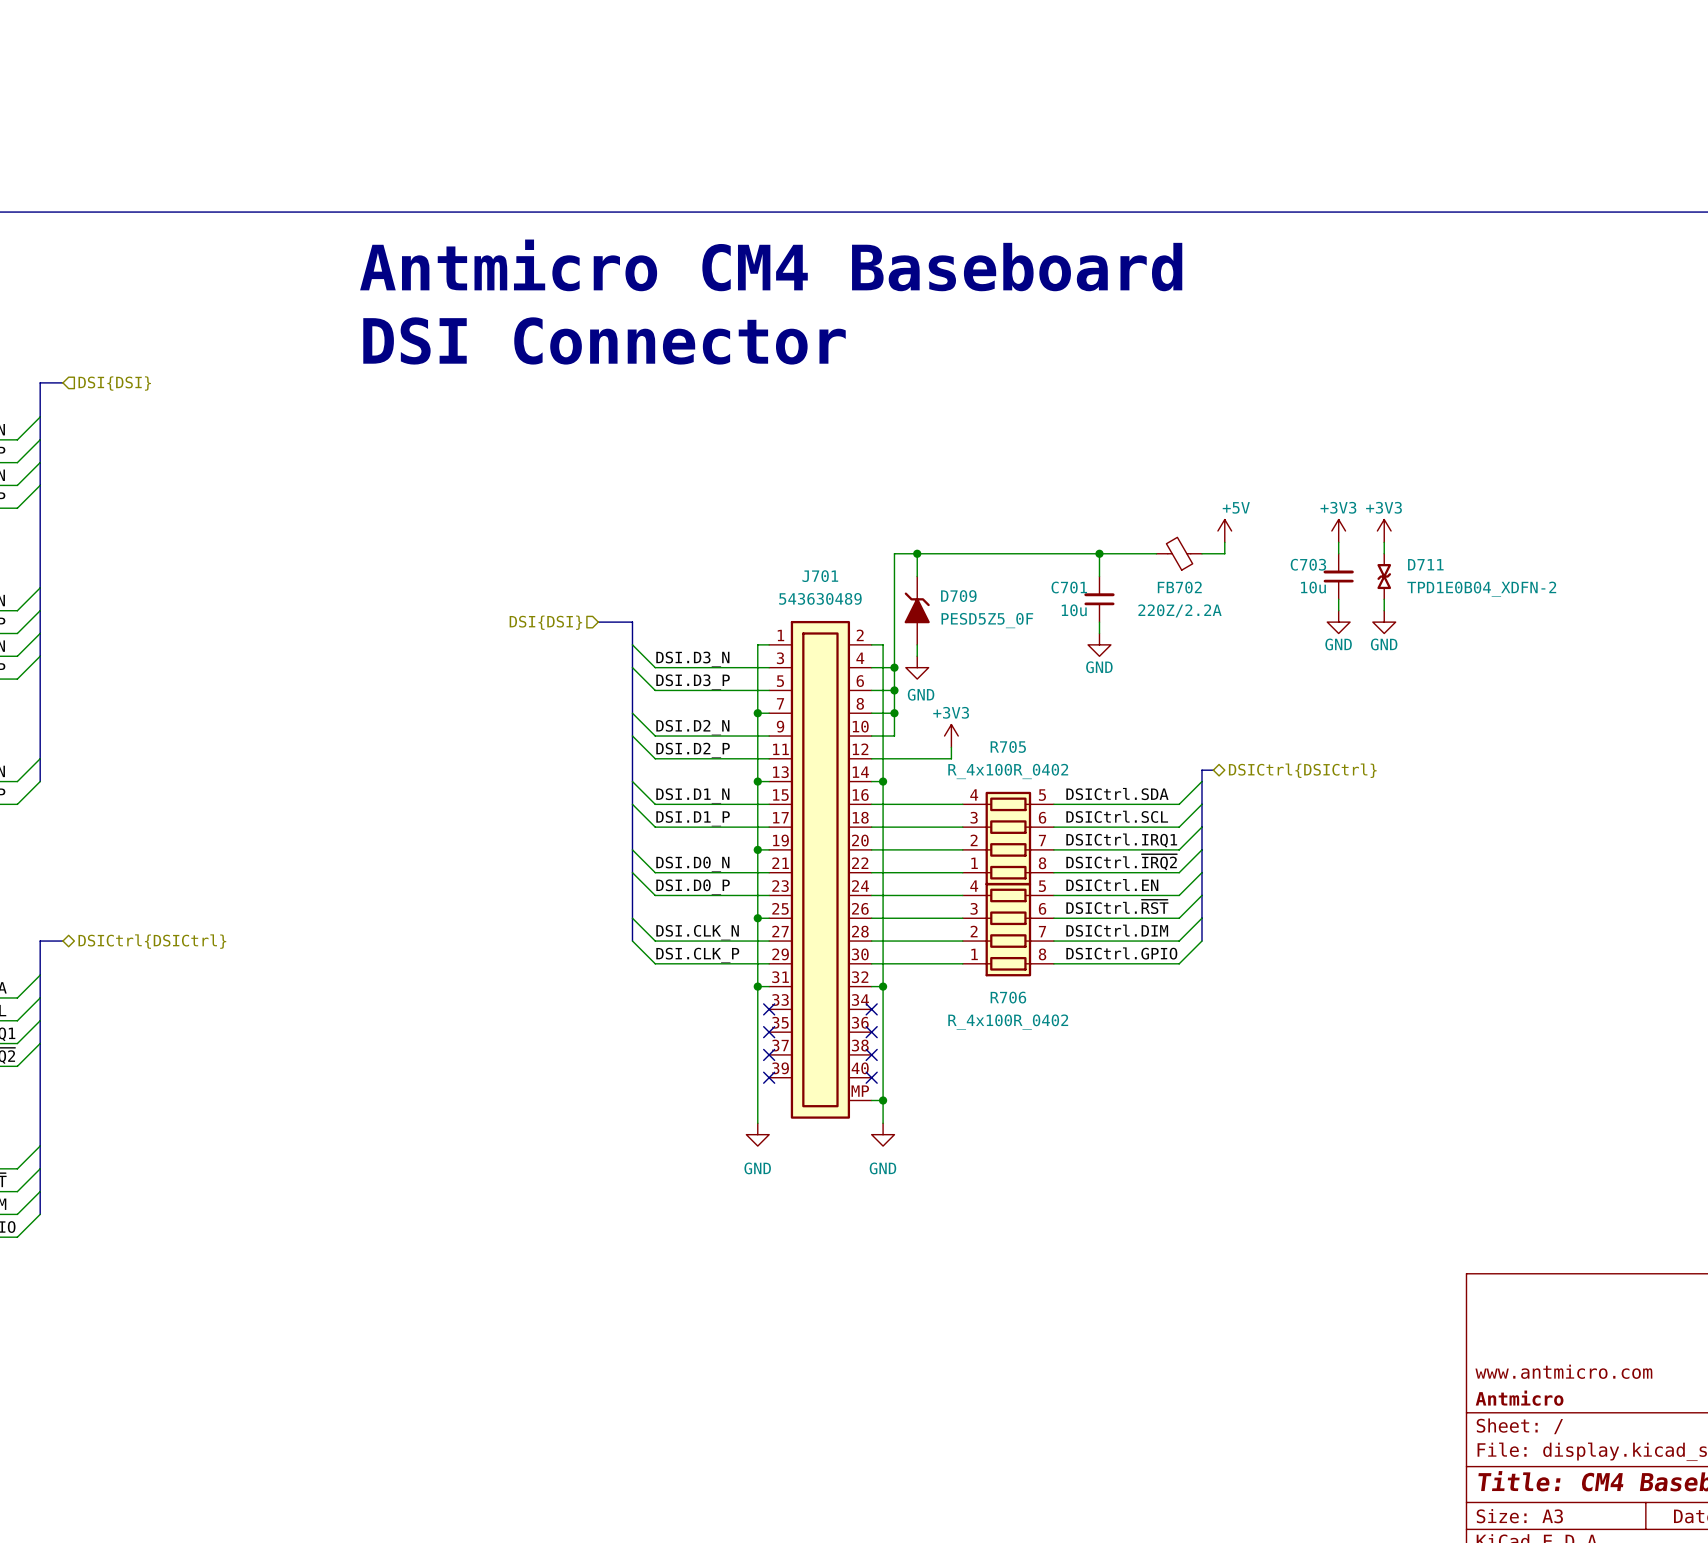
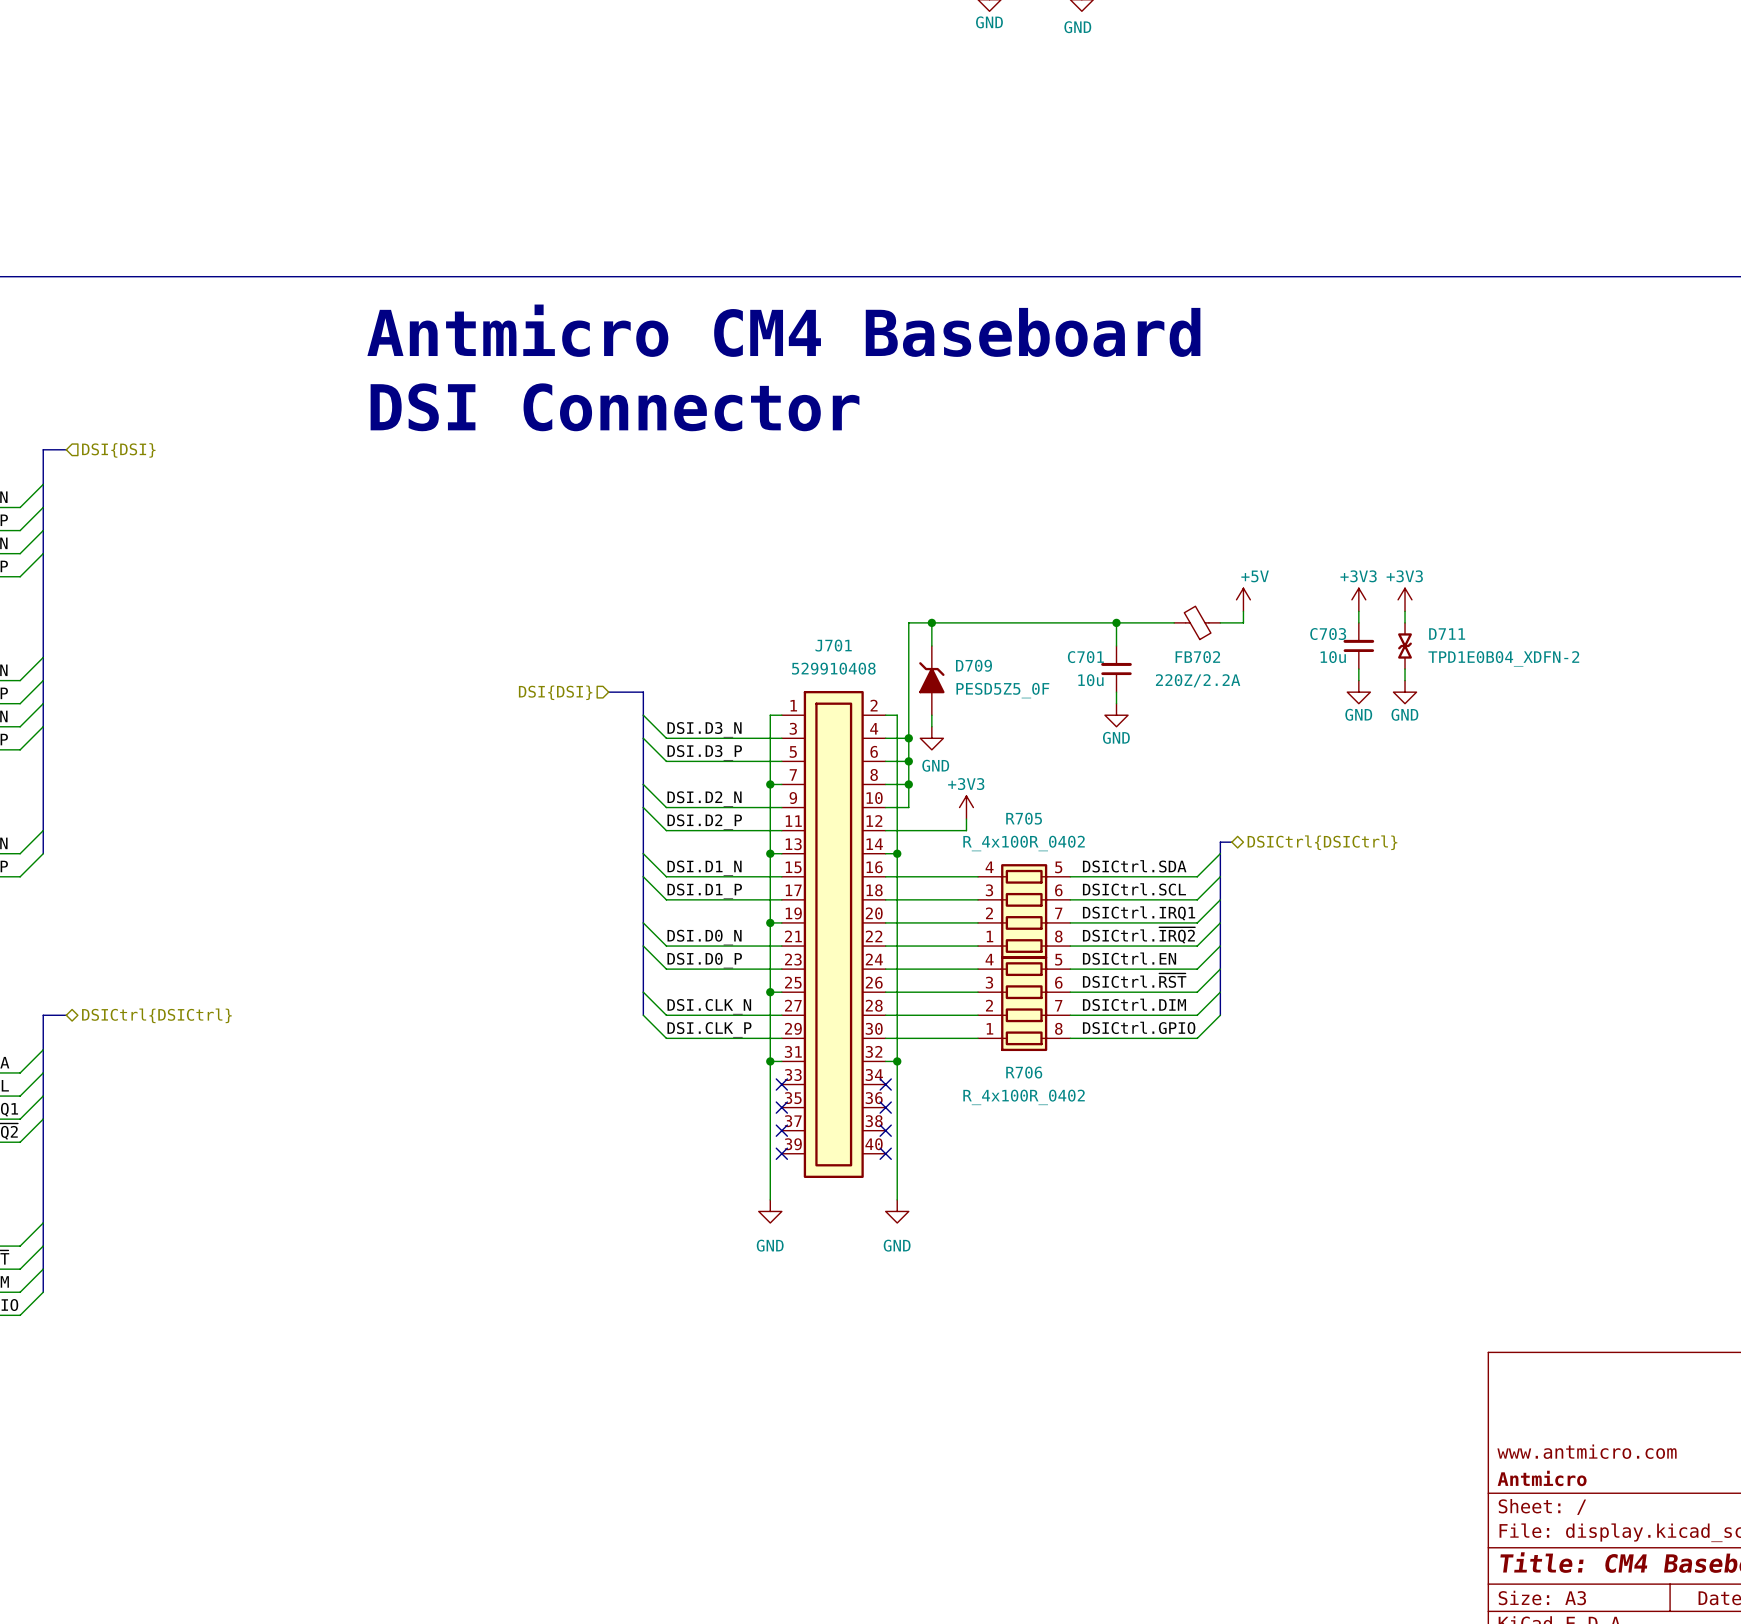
J701 text: 543630489 (820, 598) -> 529910408 (833, 668)
J701 symbol: [769, 620, 872, 1119] -> [781, 690, 886, 1178]
wire: (871, 1100) (883, 1100) -> none
junction: (883, 1100) -> none

